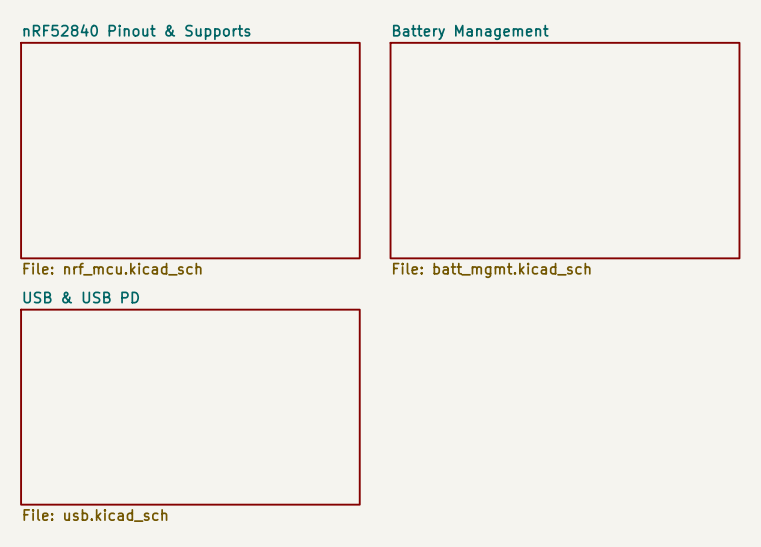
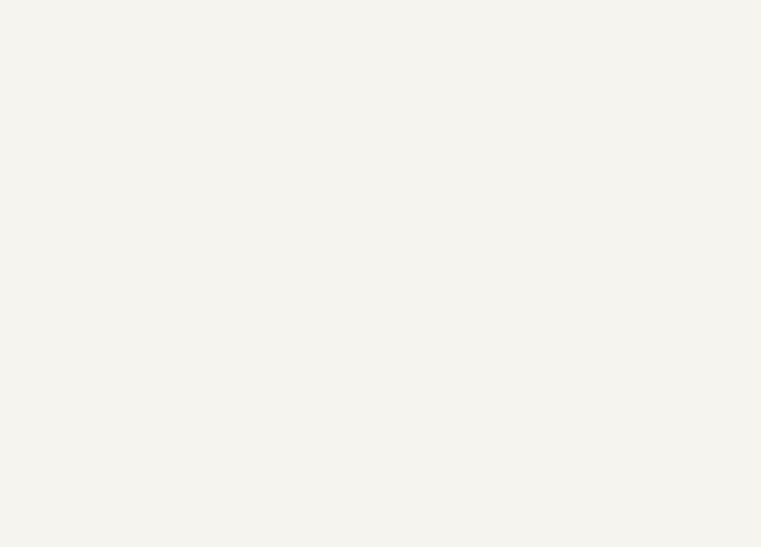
sheet nRF52840 Pinout & Supports: File: nrf_mcu.kicad_sch (190, 150) -> none
sheet Battery Management: File: batt_mgmt.kicad_sch (565, 150) -> none
sheet USB & USB PD: File: usb.kicad_sch (190, 407) -> none

